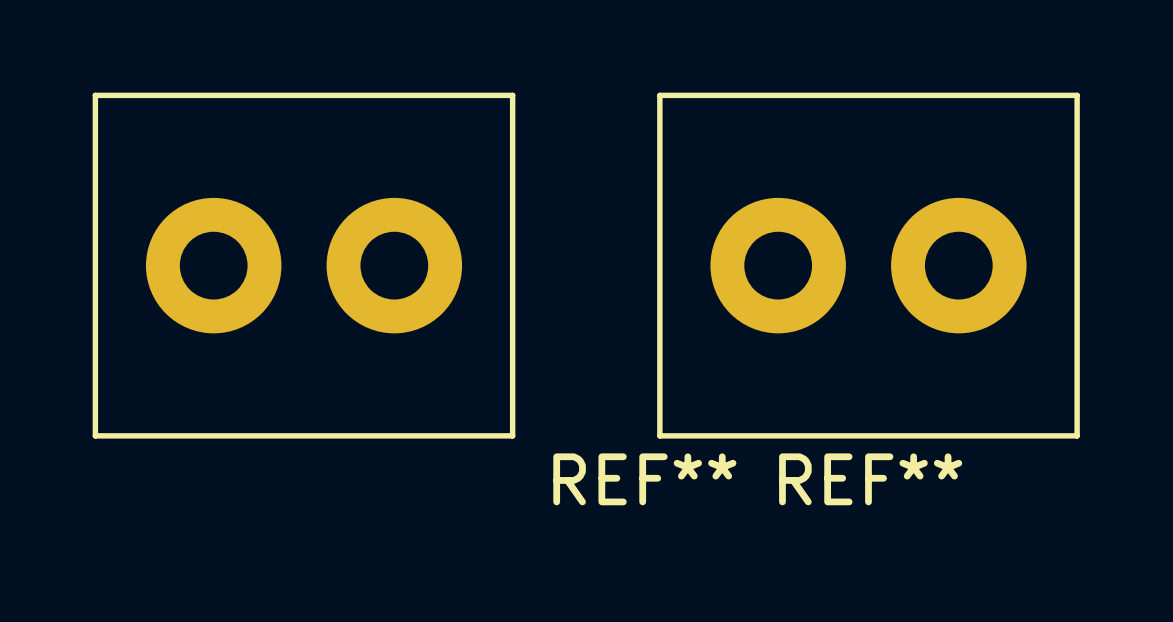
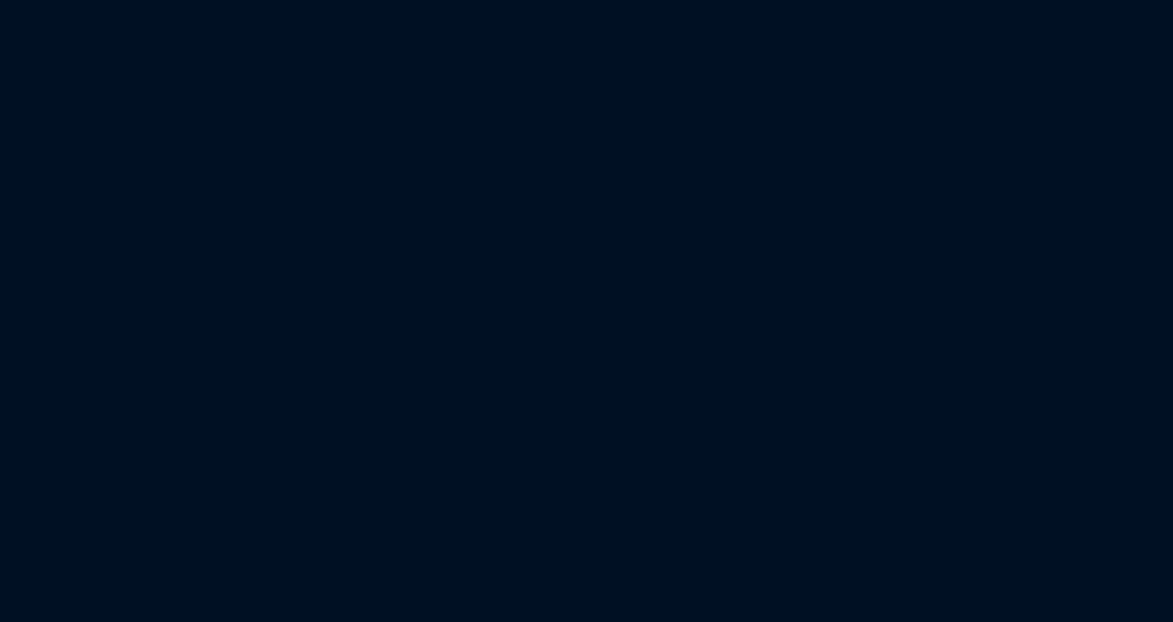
REF**: (304, 265) -> none
REF**: (868, 265) -> none

